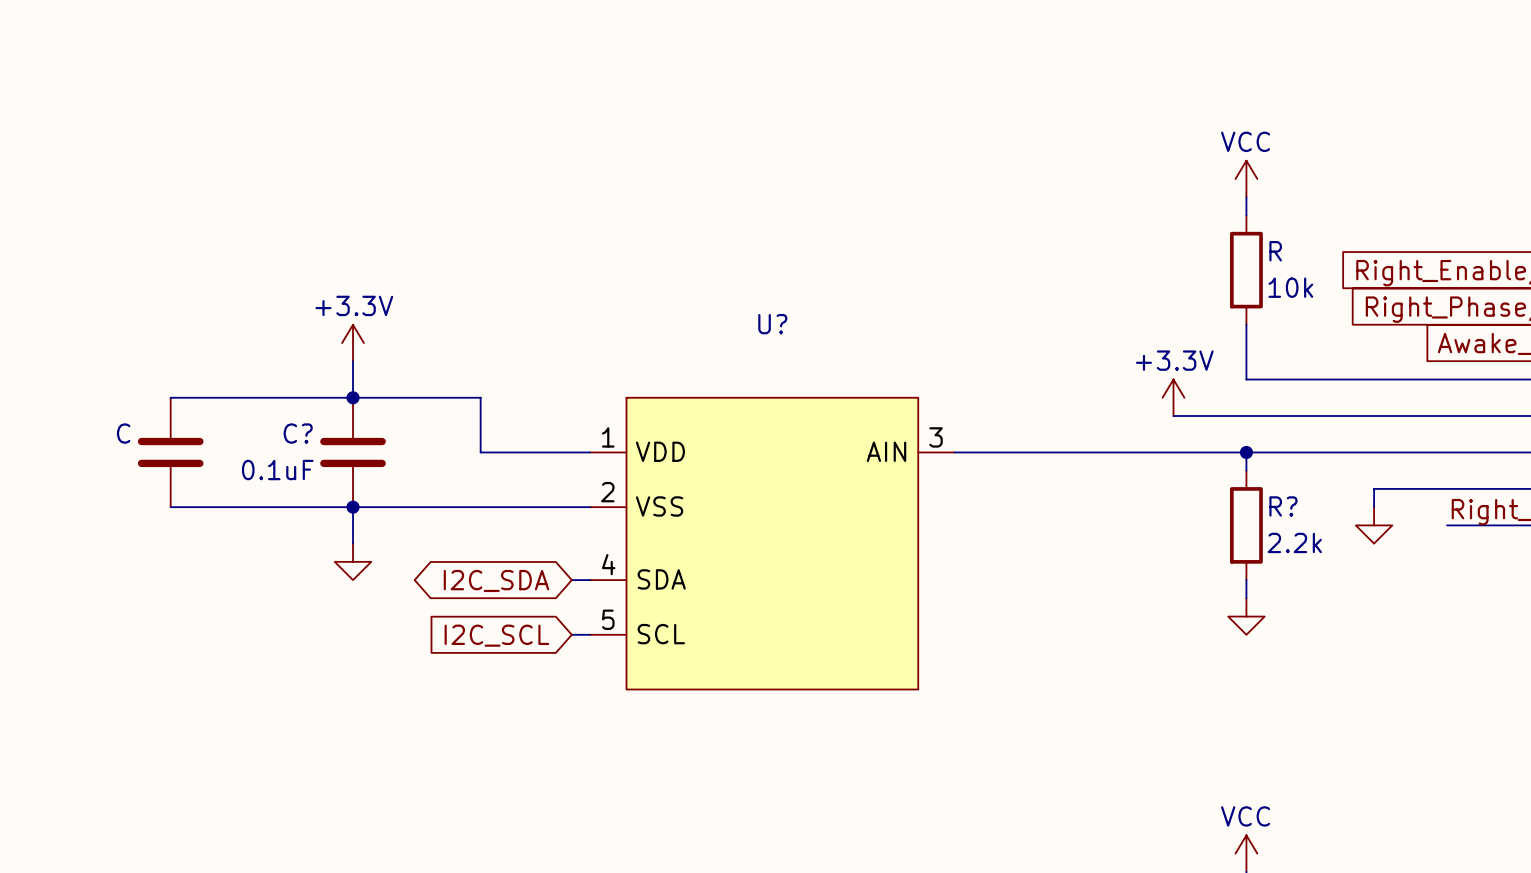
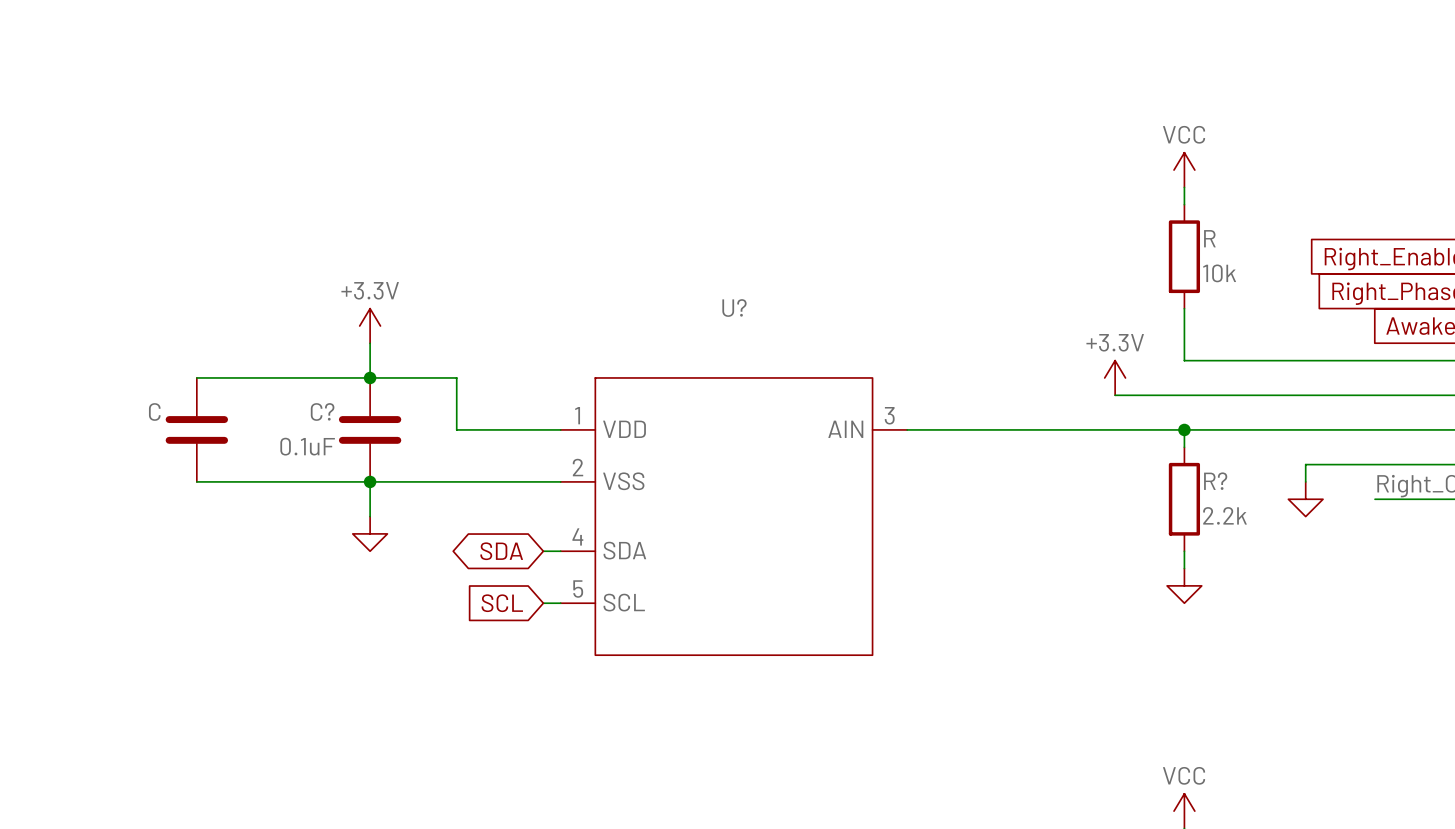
power symbol position: +3.3V (353, 343) -> +3.3V (370, 326)
wire: (353, 361) (353, 397) -> (370, 343) (370, 377)
wire: (170, 397) (207, 397) -> none
junction position: (353, 397) -> (370, 377)
C position: (170, 452) -> (196, 429)
C? position: (353, 452) -> (370, 429)
wire: (170, 507) (207, 507) -> none
wire: (353, 507) (353, 543) -> (370, 481) (370, 516)
junction position: (353, 507) -> (370, 481)
power symbol position: (353, 561) -> (370, 533)
global label: I2C_SDA (496, 580) -> SDA (501, 551)
global label: I2C_SCL (496, 635) -> SCL (502, 603)

